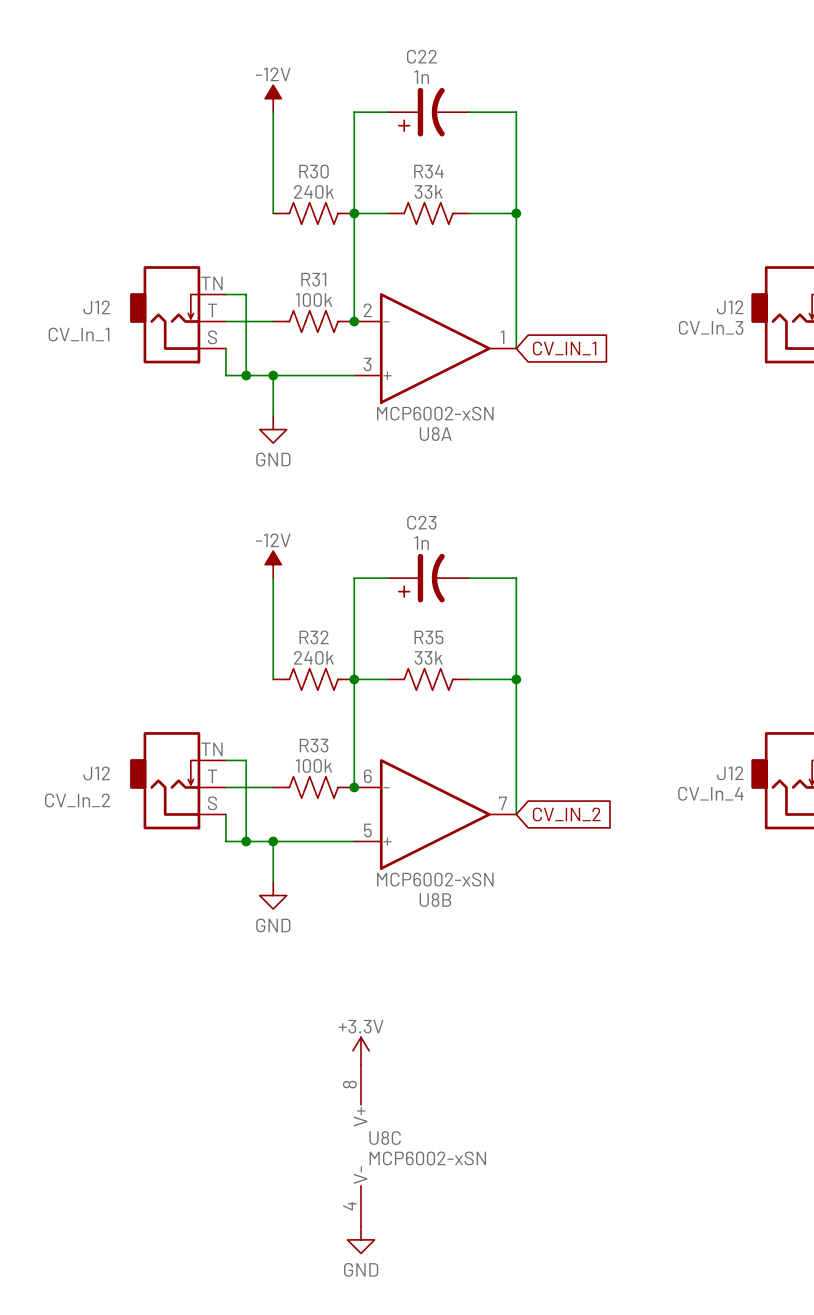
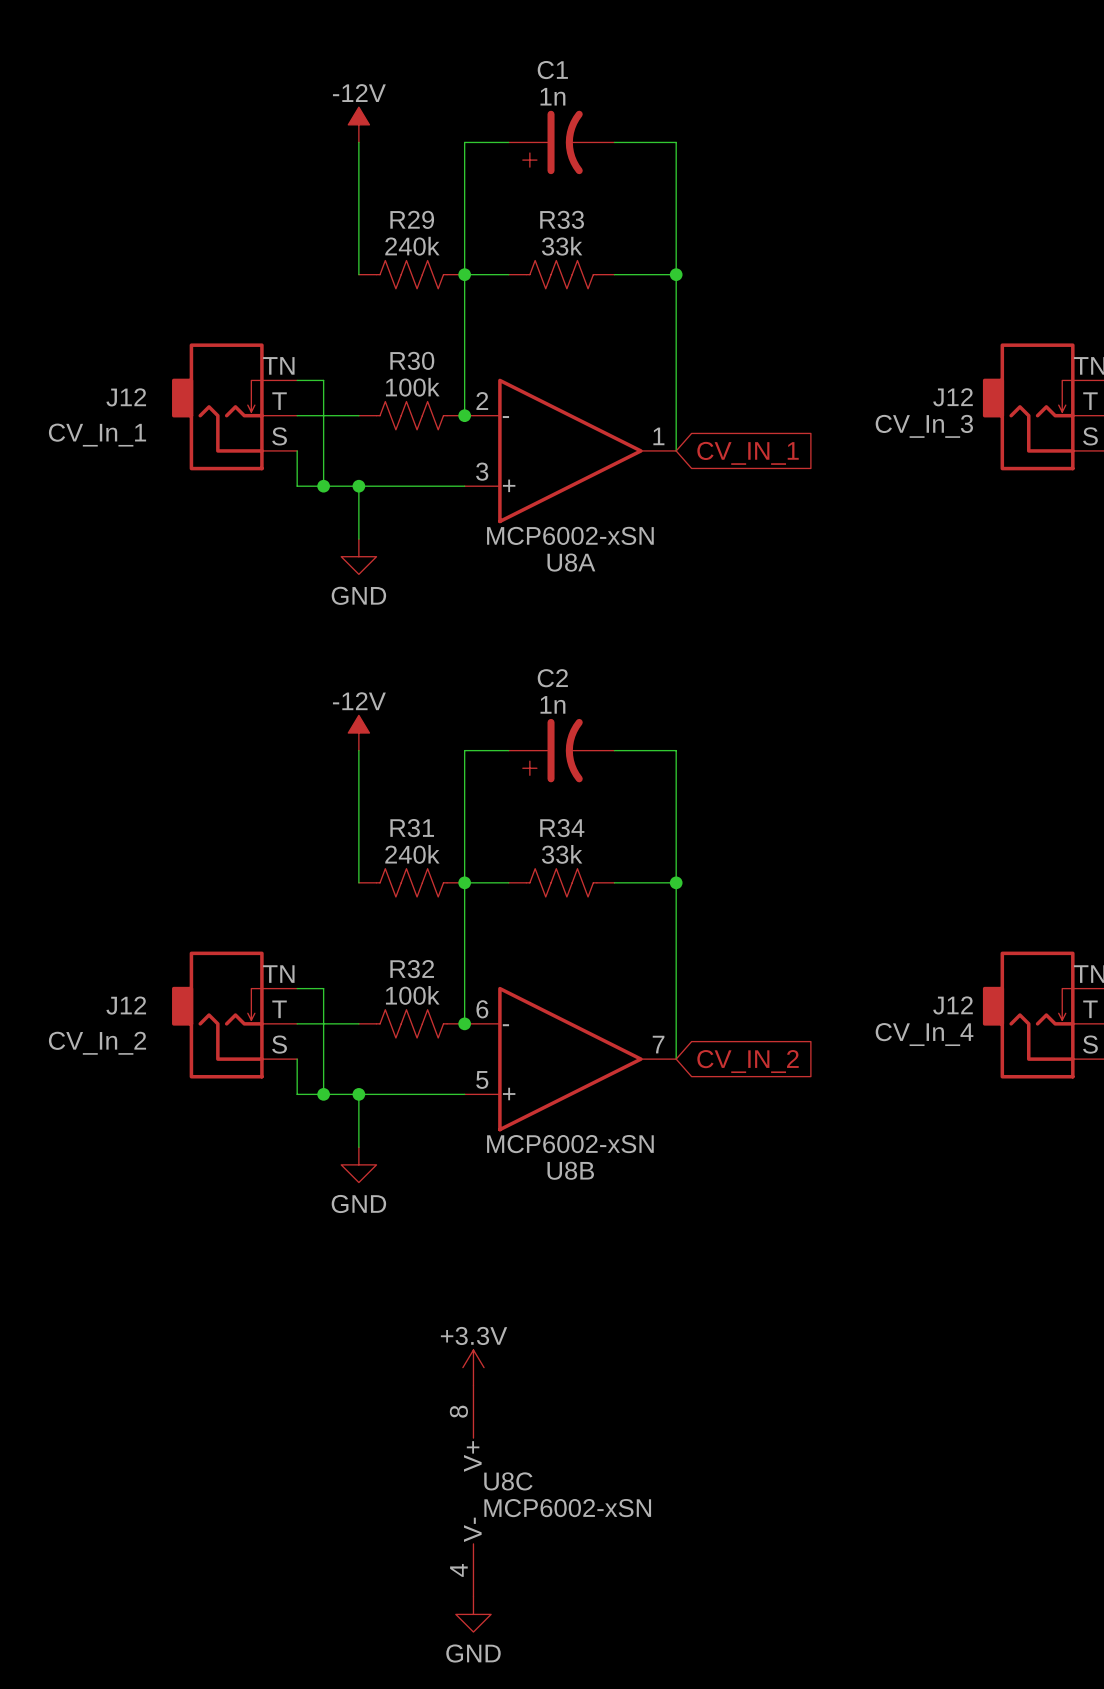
C22 name: C22 (421, 56) -> C1 (552, 70)
R30 name: R30 (313, 171) -> R29 (412, 219)
R34 name: R34 (428, 171) -> R33 (562, 219)
R31 name: R31 (313, 279) -> R30 (412, 360)
C23 name: C23 (421, 522) -> C2 (552, 678)
R32 name: R32 (314, 637) -> R31 (412, 828)
R35 name: R35 (428, 637) -> R34 (562, 828)
R33 name: R33 (314, 745) -> R32 (412, 969)

